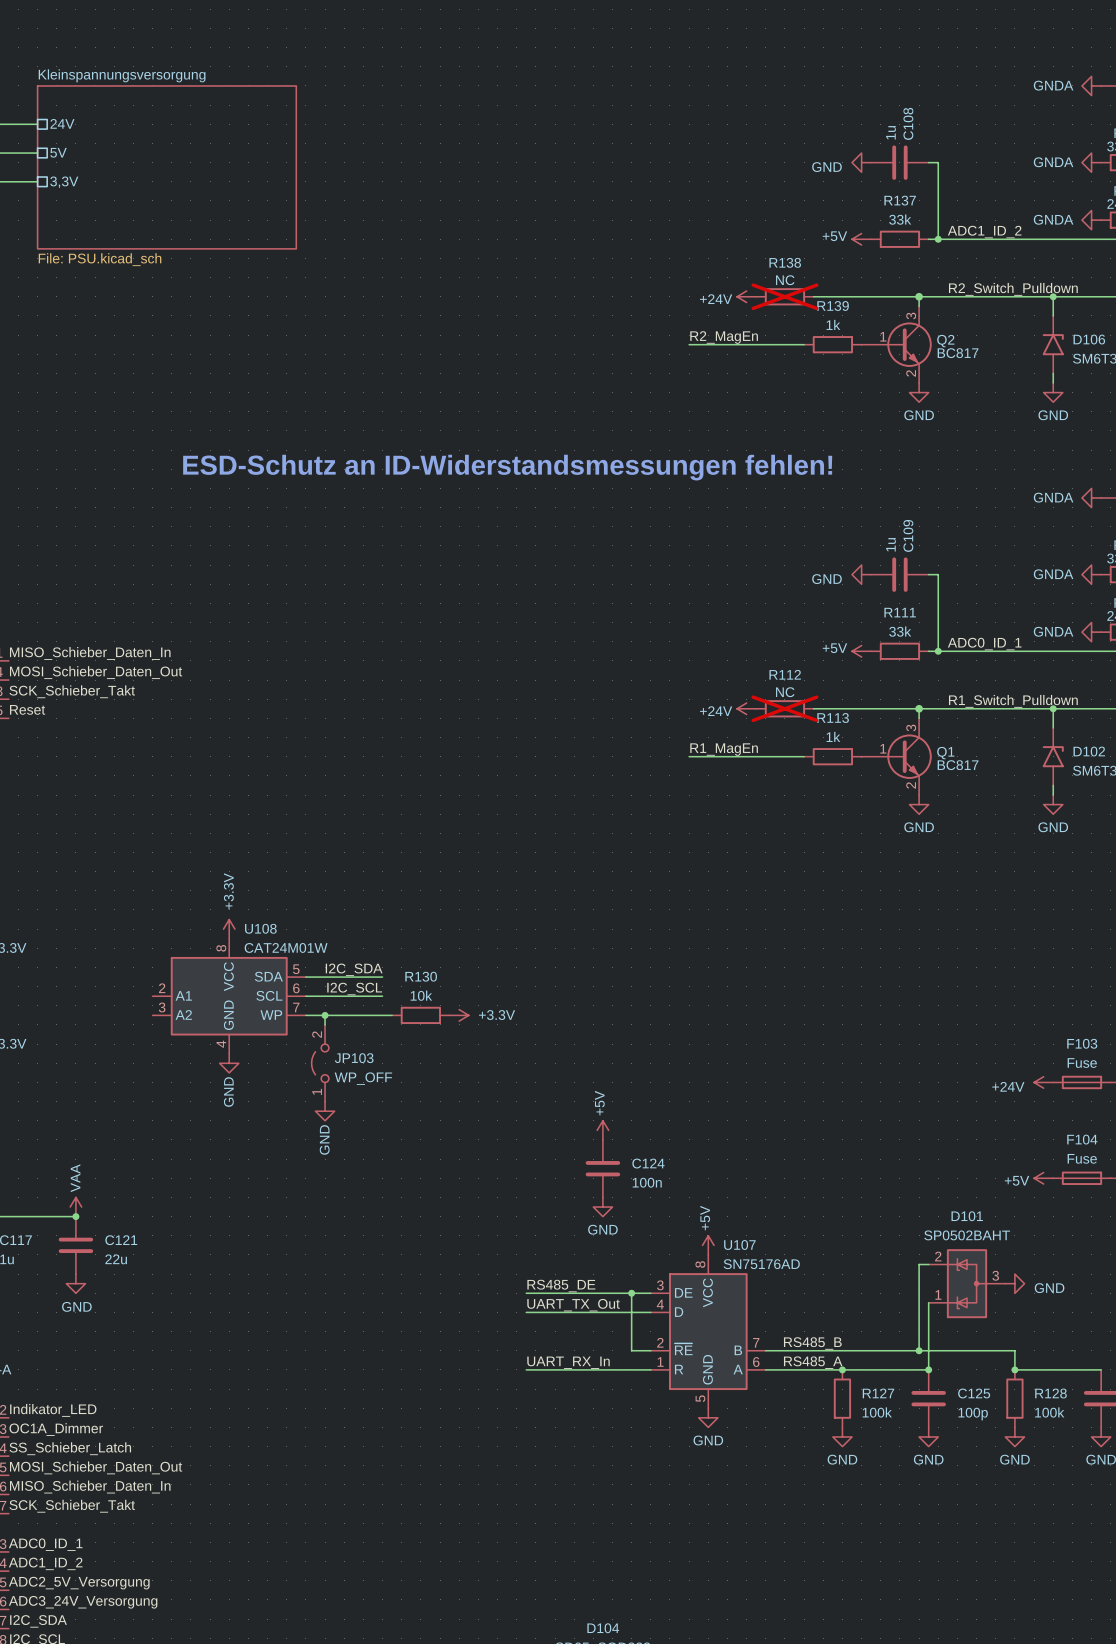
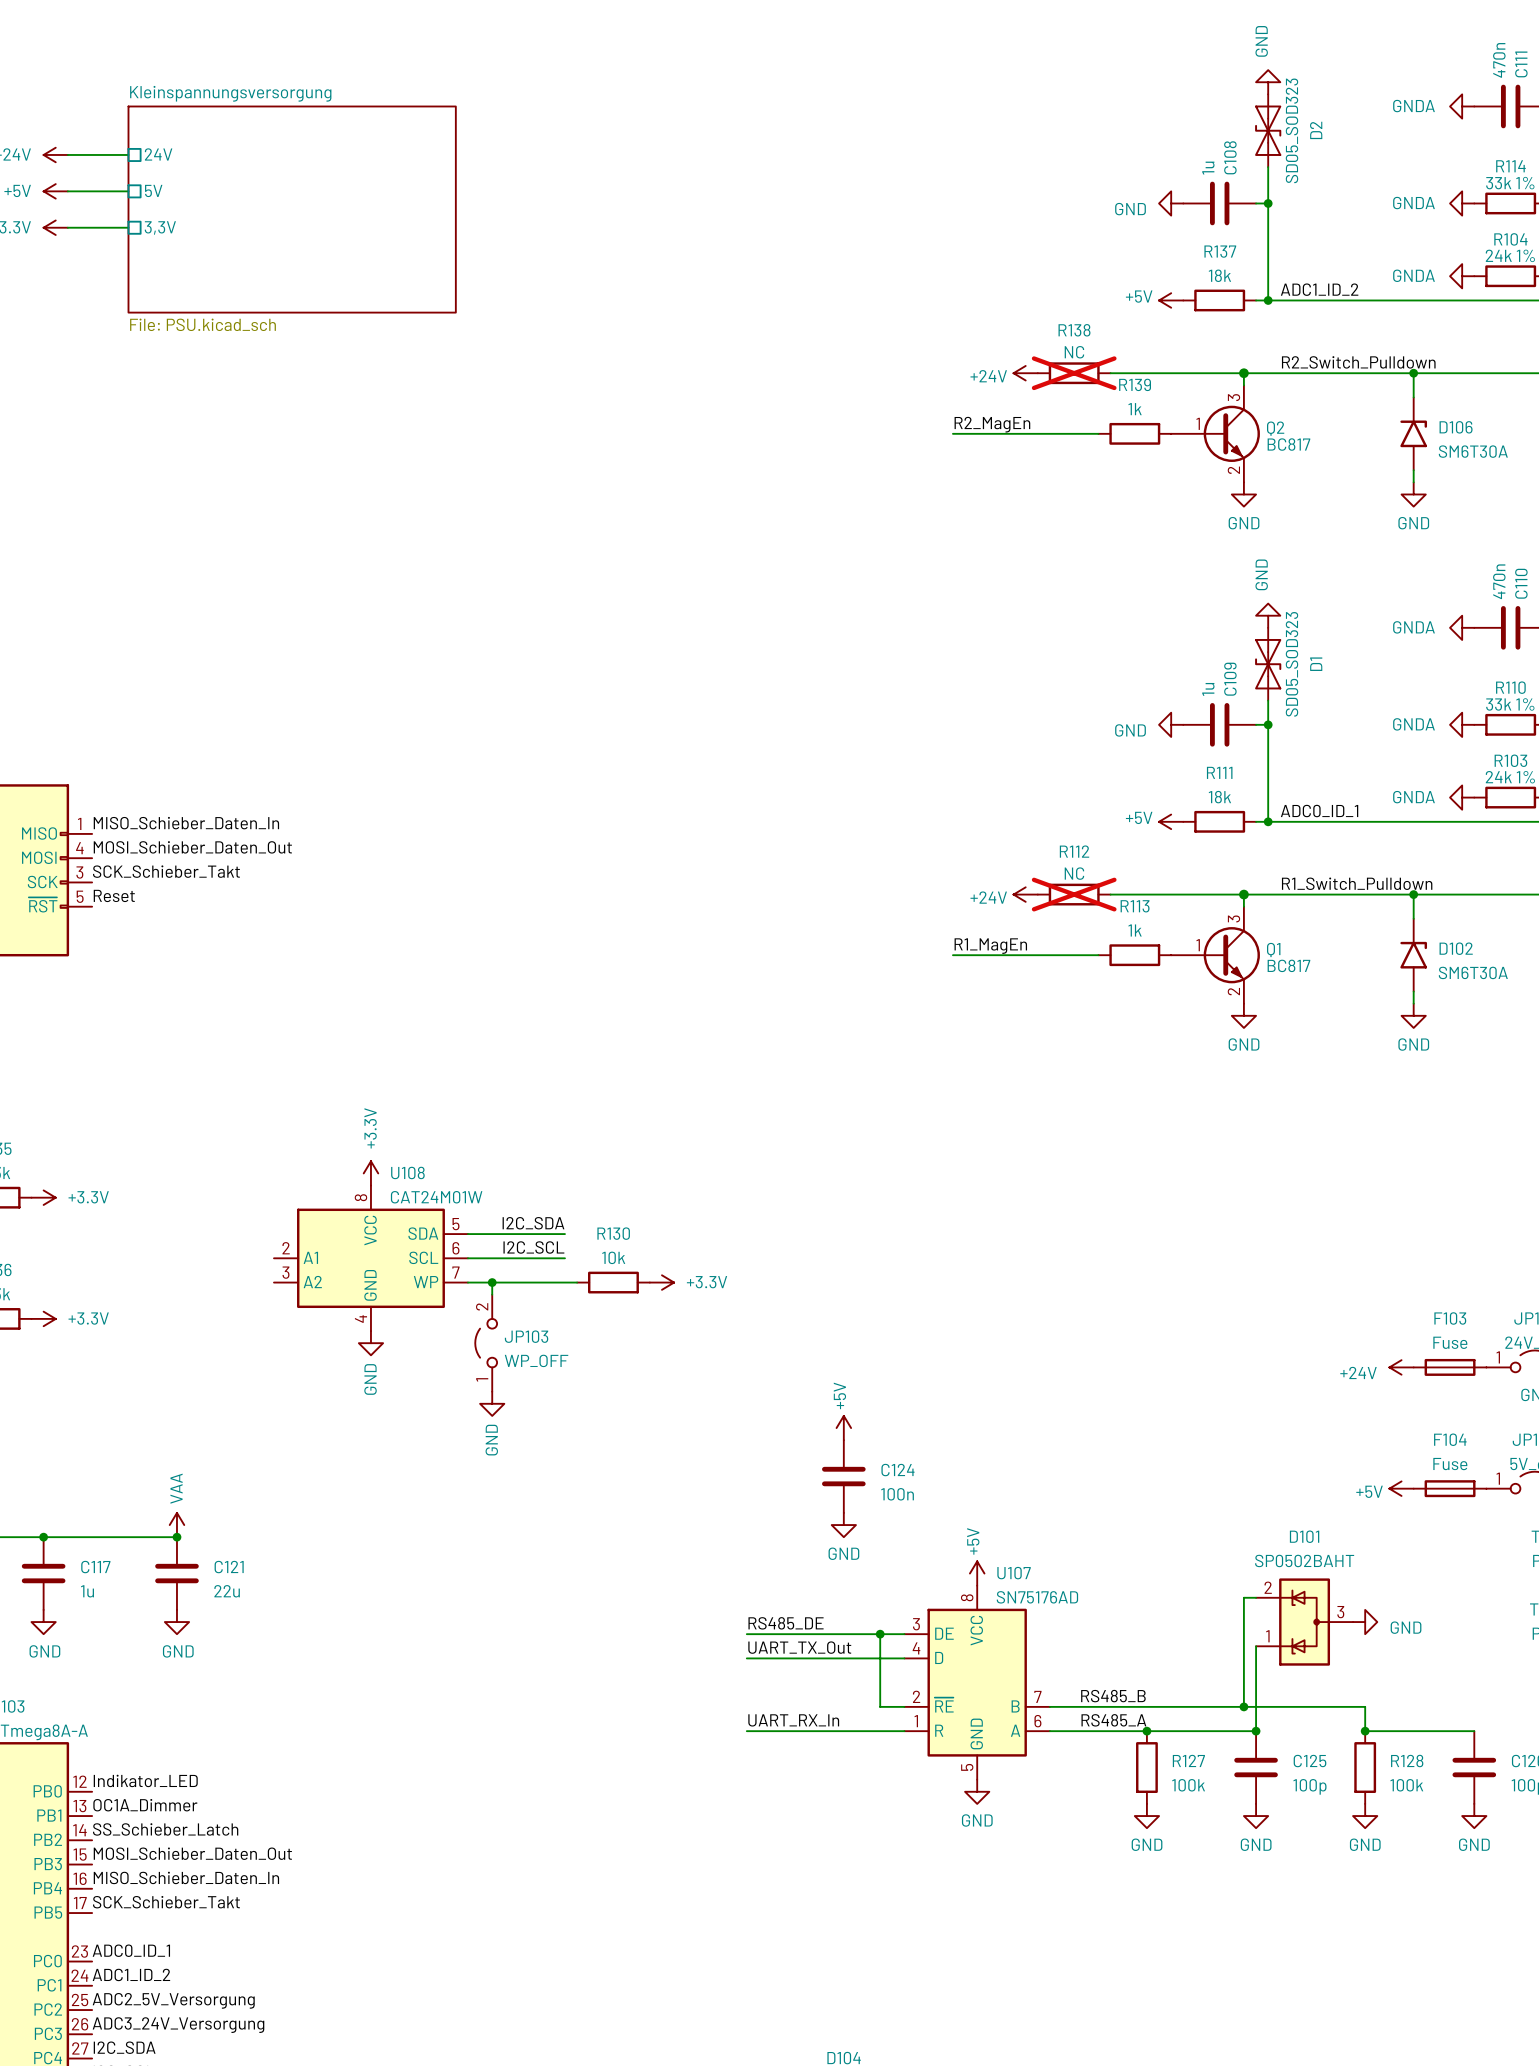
power symbol: none -> GND (1268, 82)
D2: none -> SD05_SOD323 (1268, 130)
wire: none -> (1268, 167) (1268, 203)
junction: none -> (1268, 203)
R137 value: 33k (900, 219) -> 18k (1219, 275)
text: ESD-Schutz an ID-Widerstandsmessungen fehlen! (507, 467) -> none
power symbol: none -> GND (1268, 615)
D1: none -> SD05_SOD323 (1268, 664)
wire: none -> (1268, 700) (1268, 724)
junction: none -> (1268, 724)
R111 value: 33k (900, 631) -> 18k (1219, 797)

